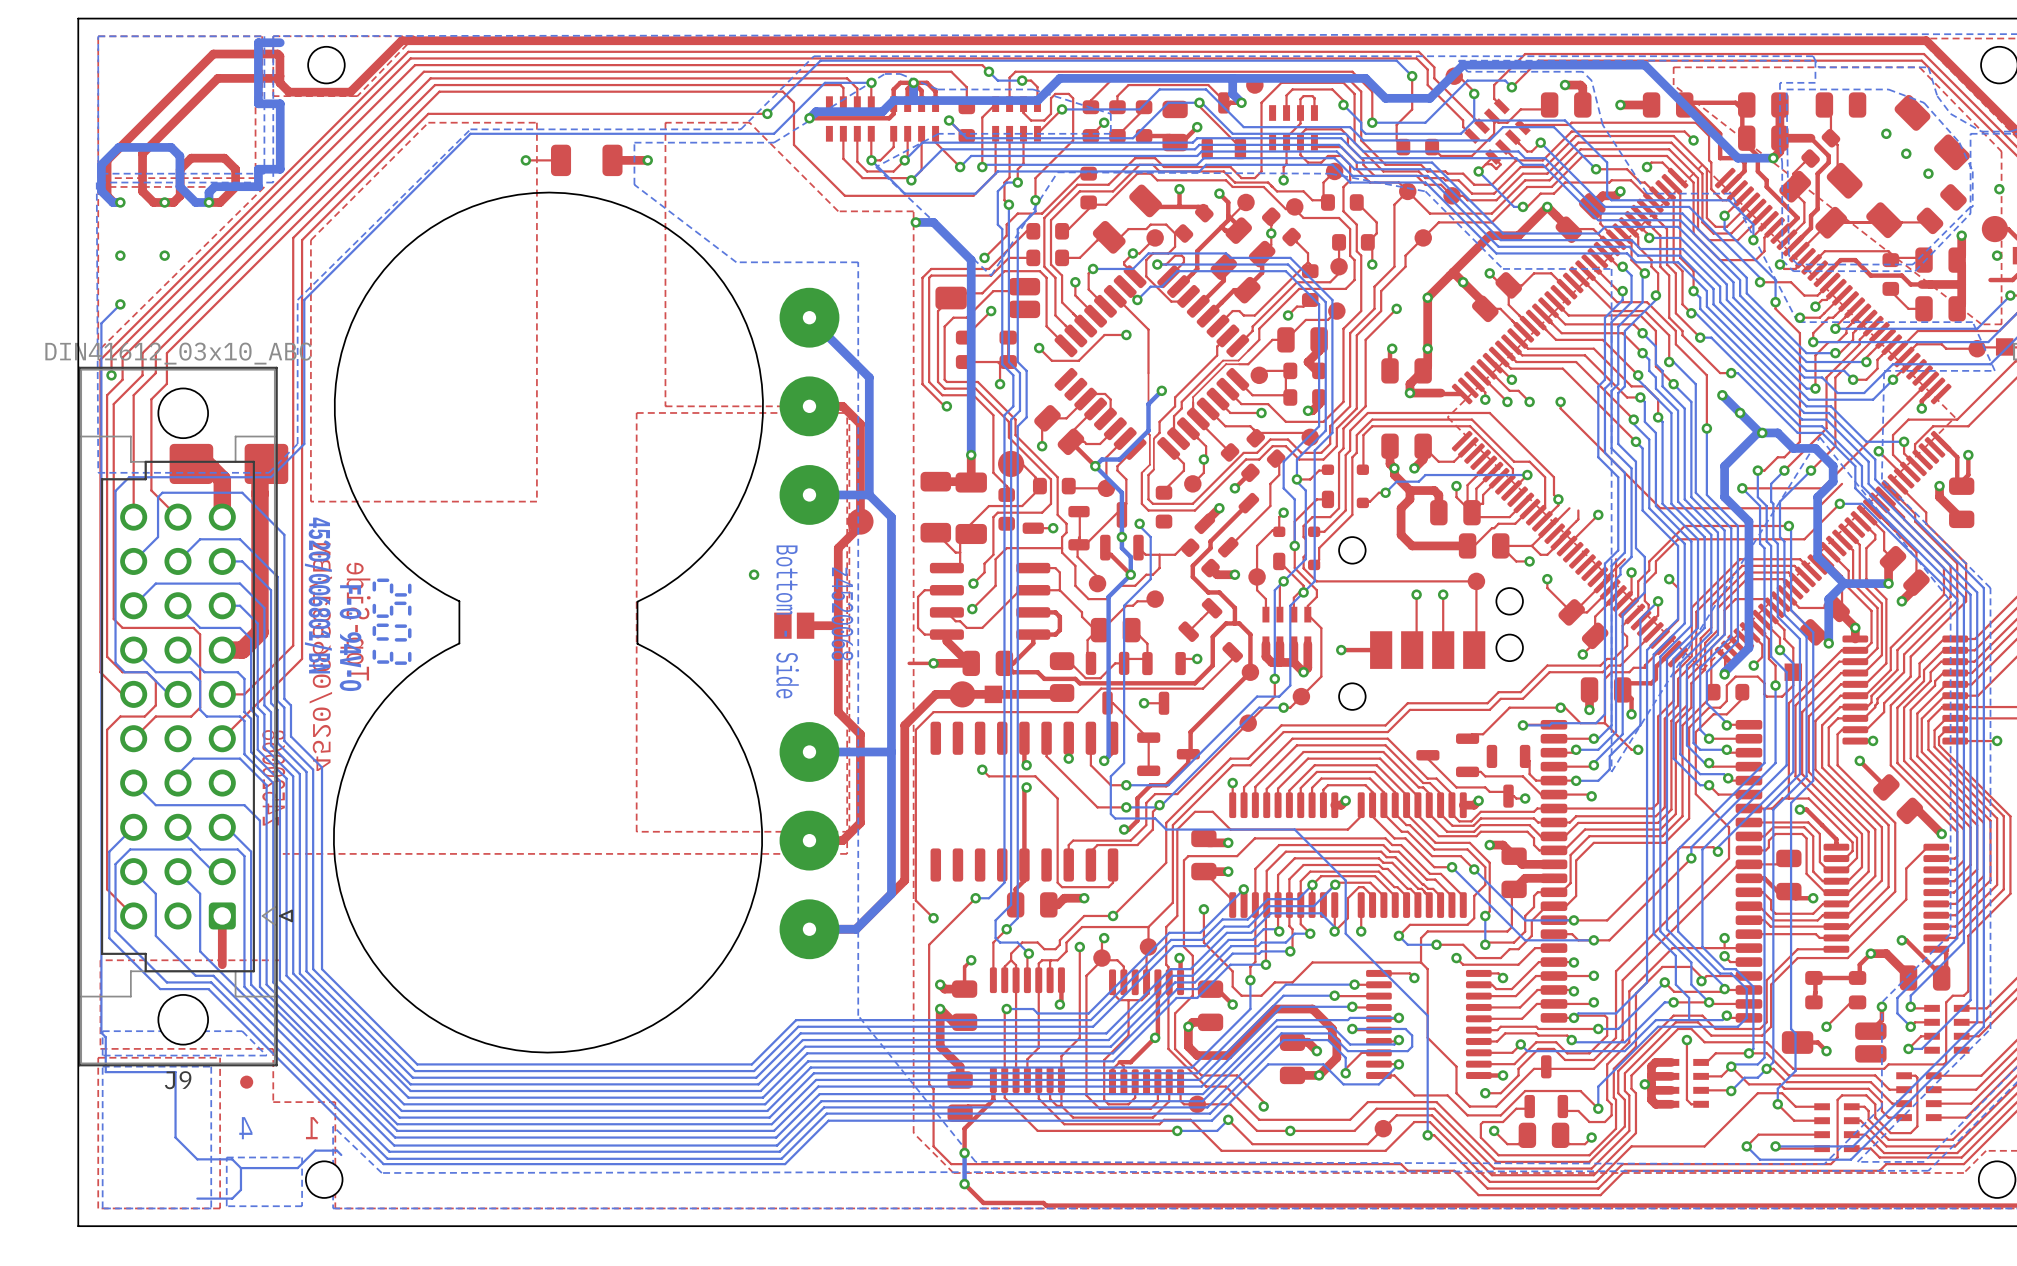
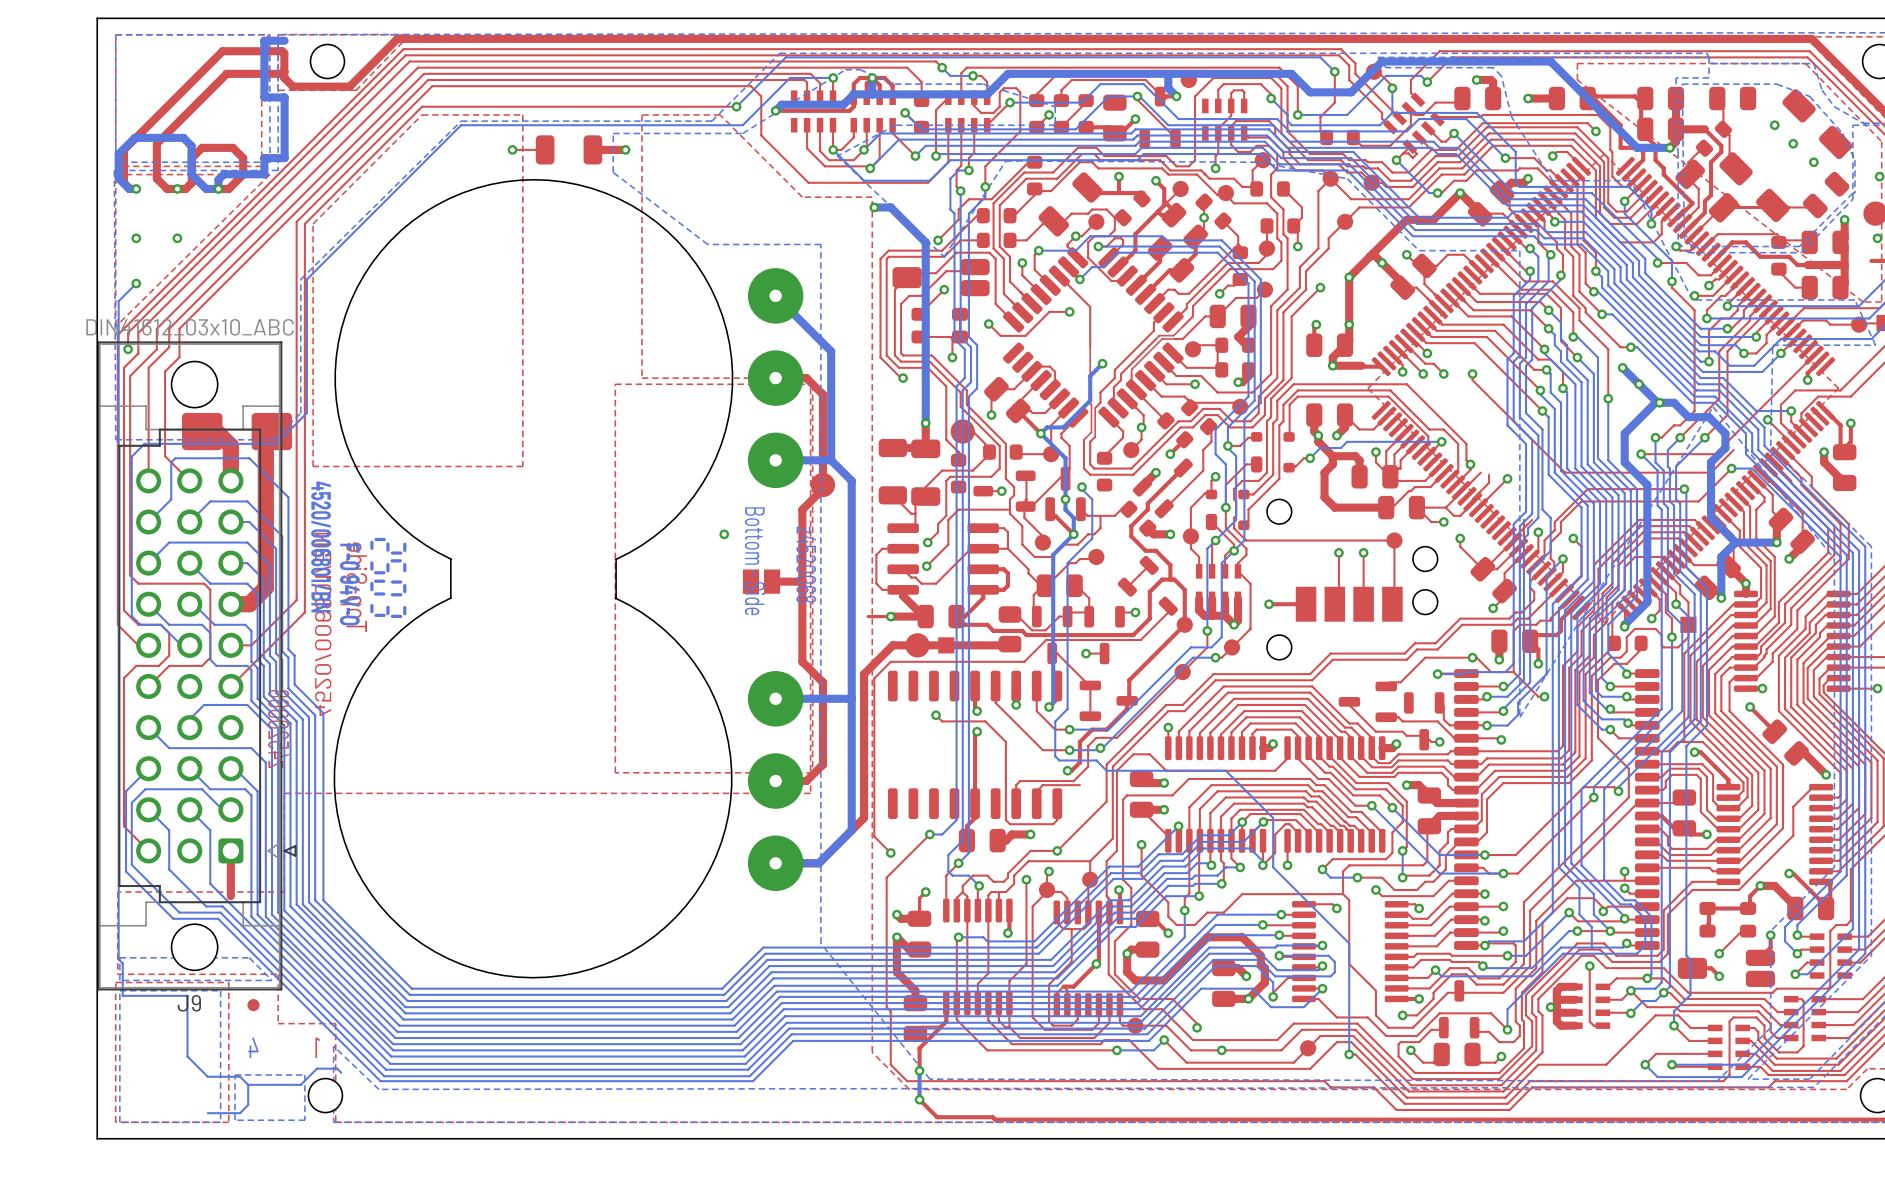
top track: (1159, 805) (1152, 811) (1152, 829) (1137, 845) -> none

